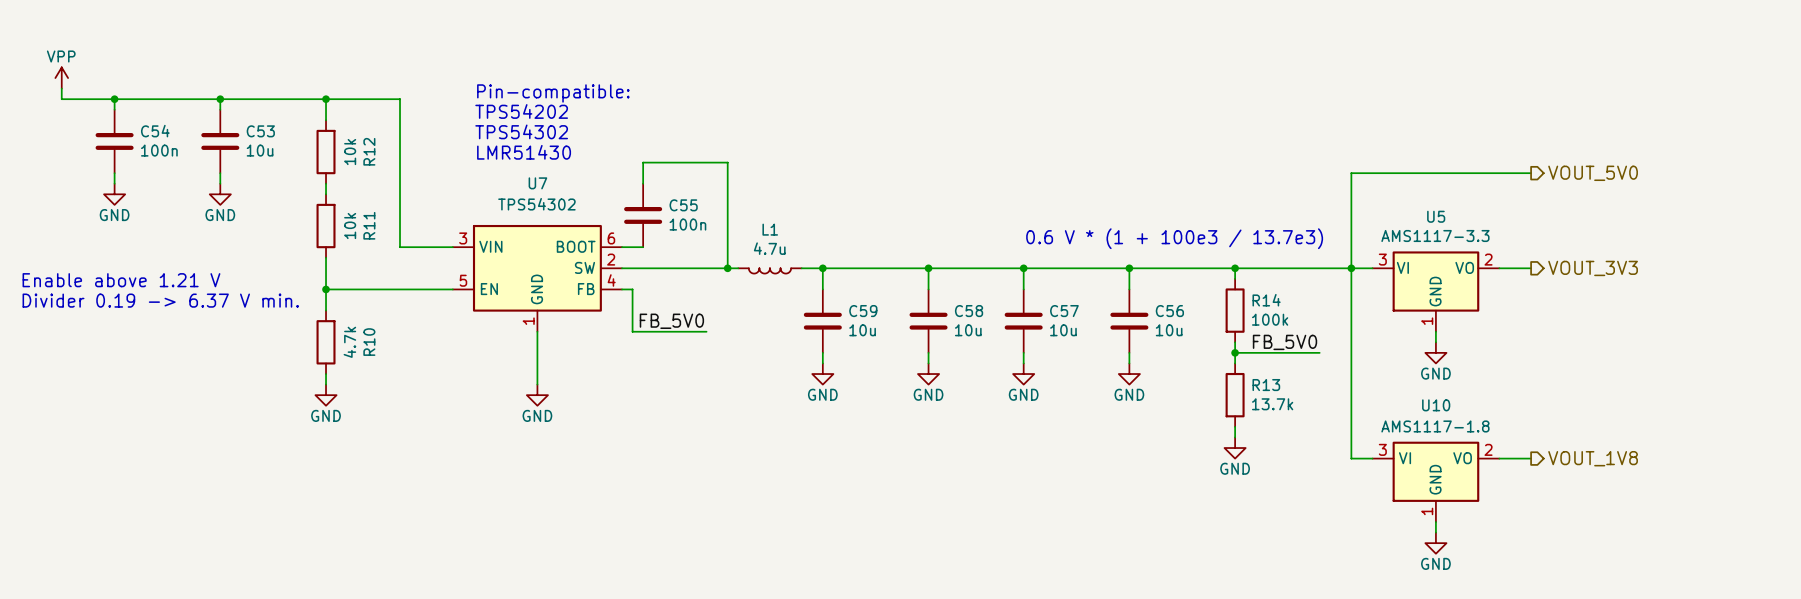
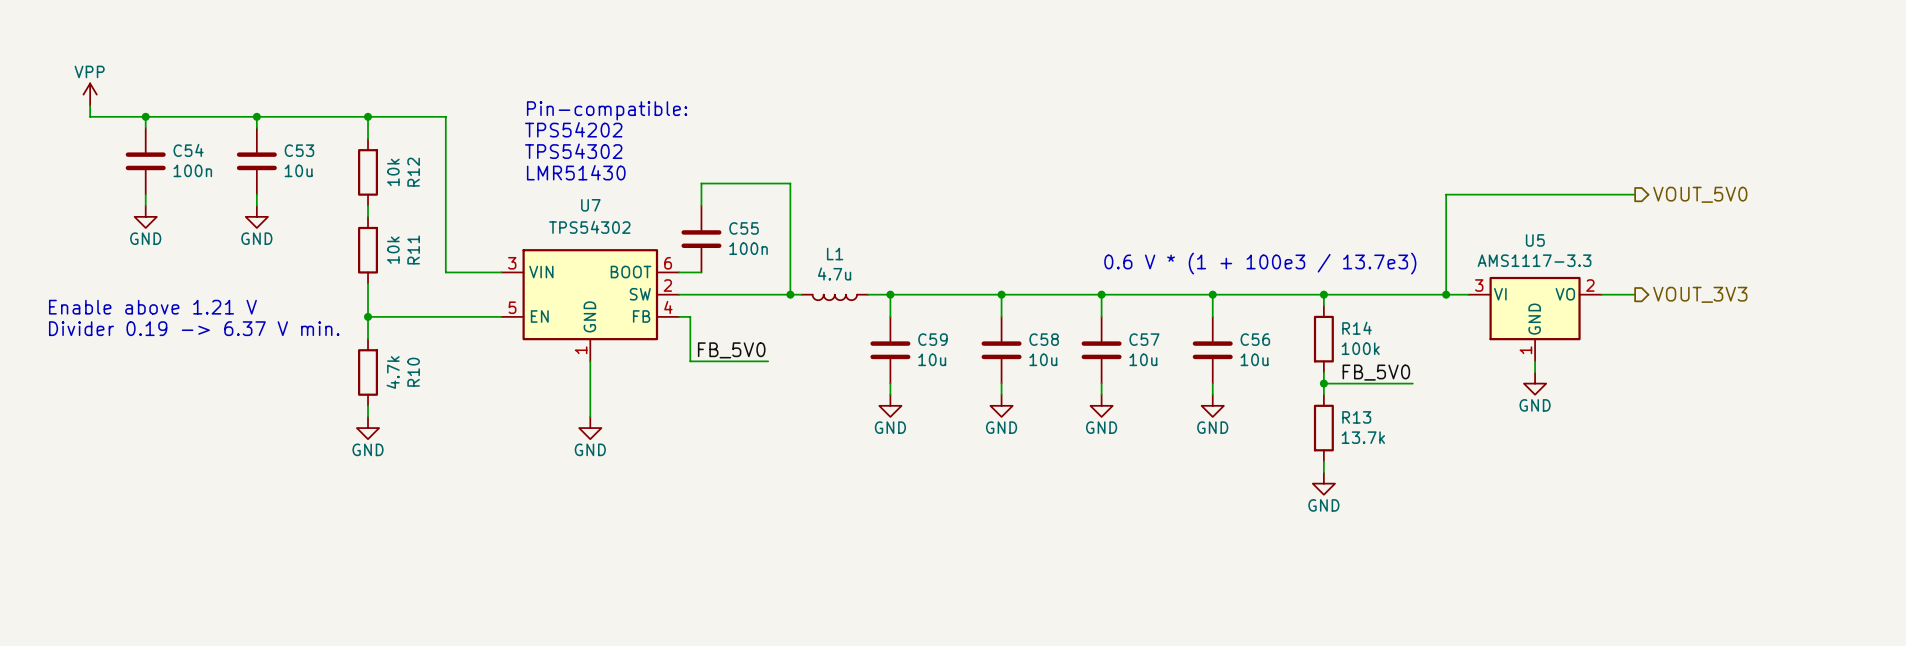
wire: (1351, 268) (1351, 458) (1372, 458) -> none
wire: (1499, 458) (1531, 458) -> none
hierarchical label: VOUT_1V8 (1593, 458) -> none
U10: AMS1117-1.8 (1435, 481) -> none
wire: (1435, 522) (1435, 532) -> none
power symbol: GND (1435, 543) -> none

